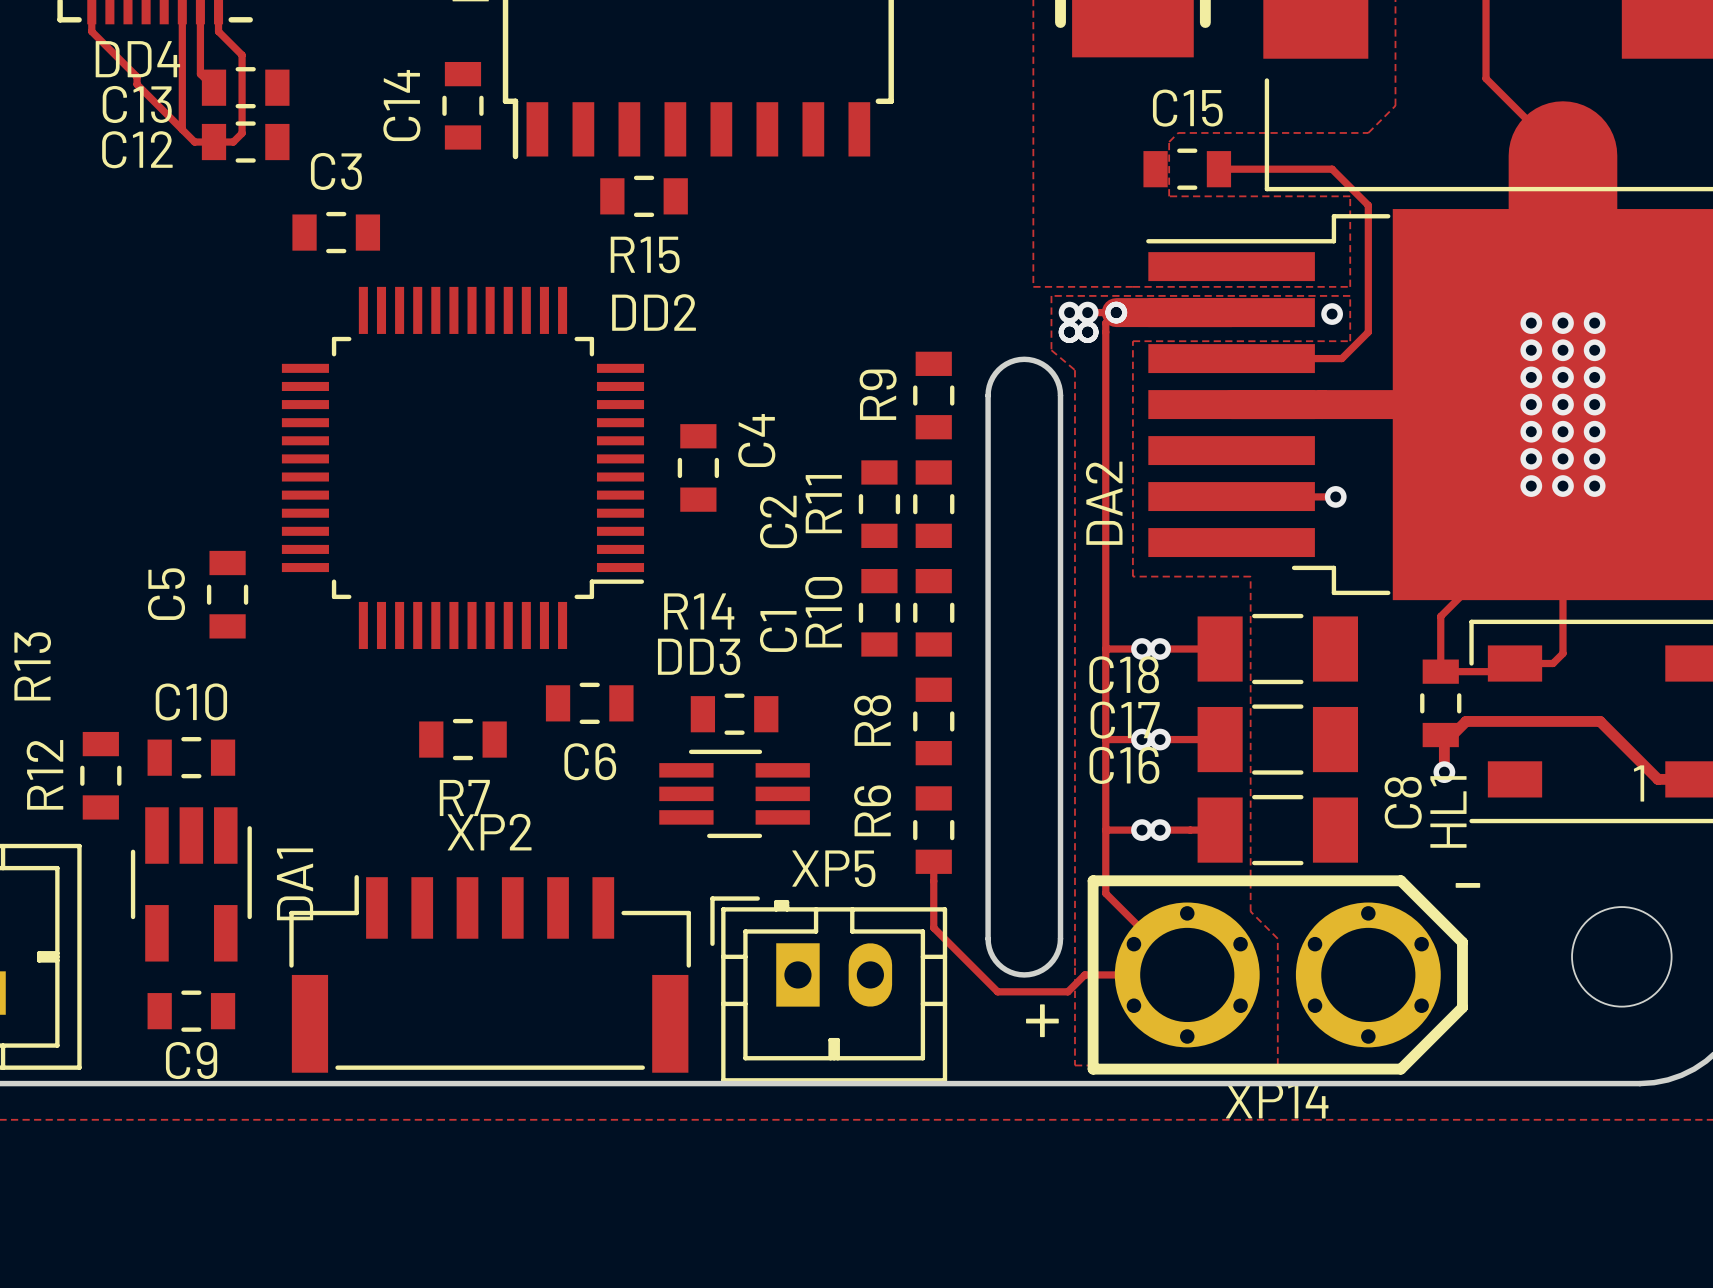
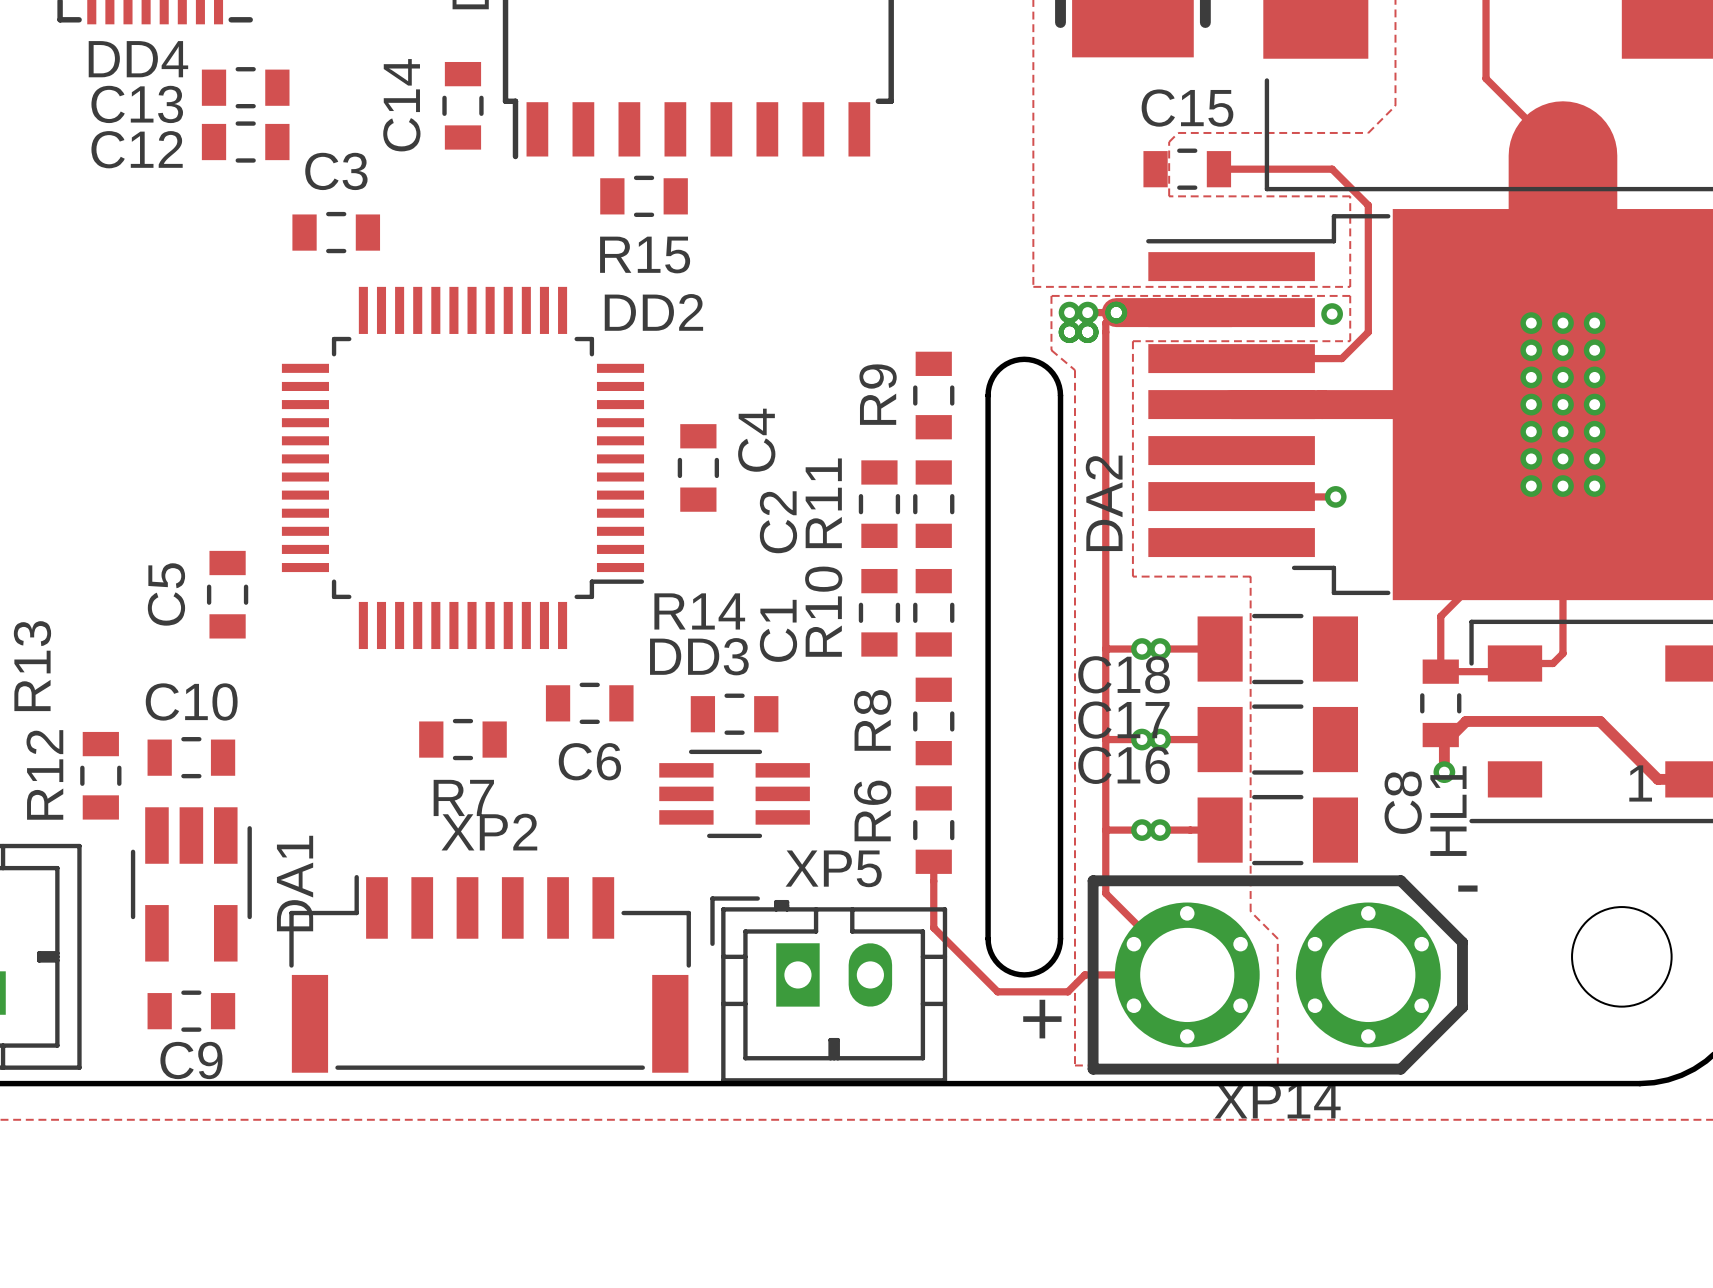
track: (91, 11) (91, 31) (137, 76) (137, 84) (194, 142) (233, 142) (242, 133) (242, 55) (218, 31) (218, 11) -> none
track: (182, 11) (182, 129) -> none
track: (200, 11) (200, 74) (214, 87) -> none

